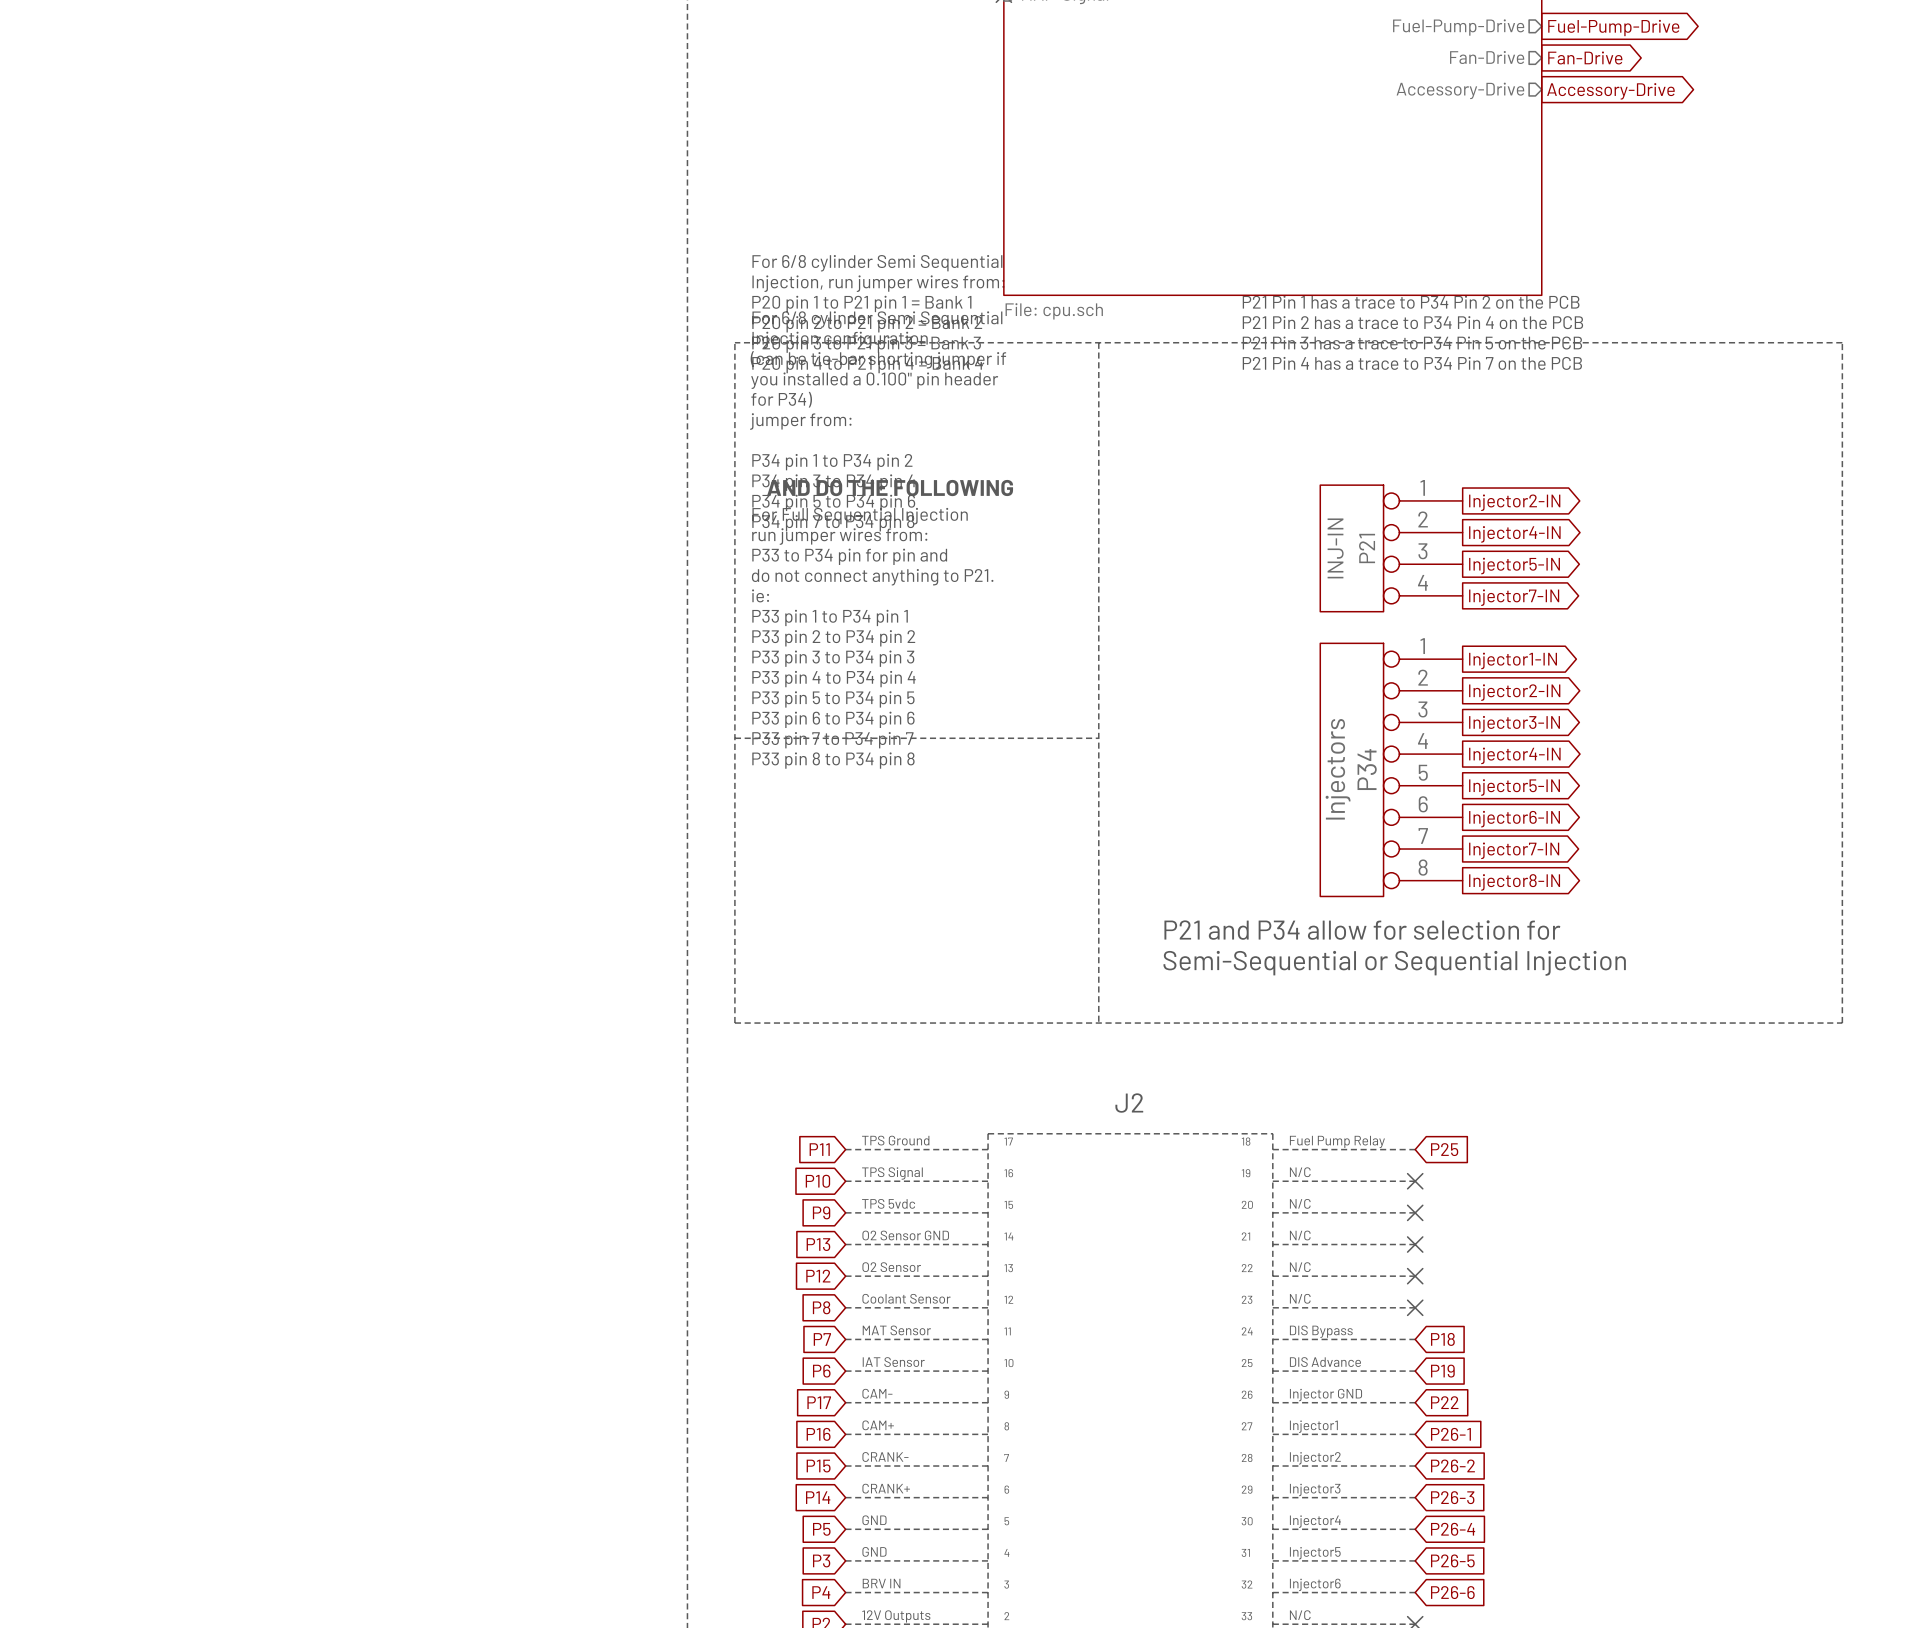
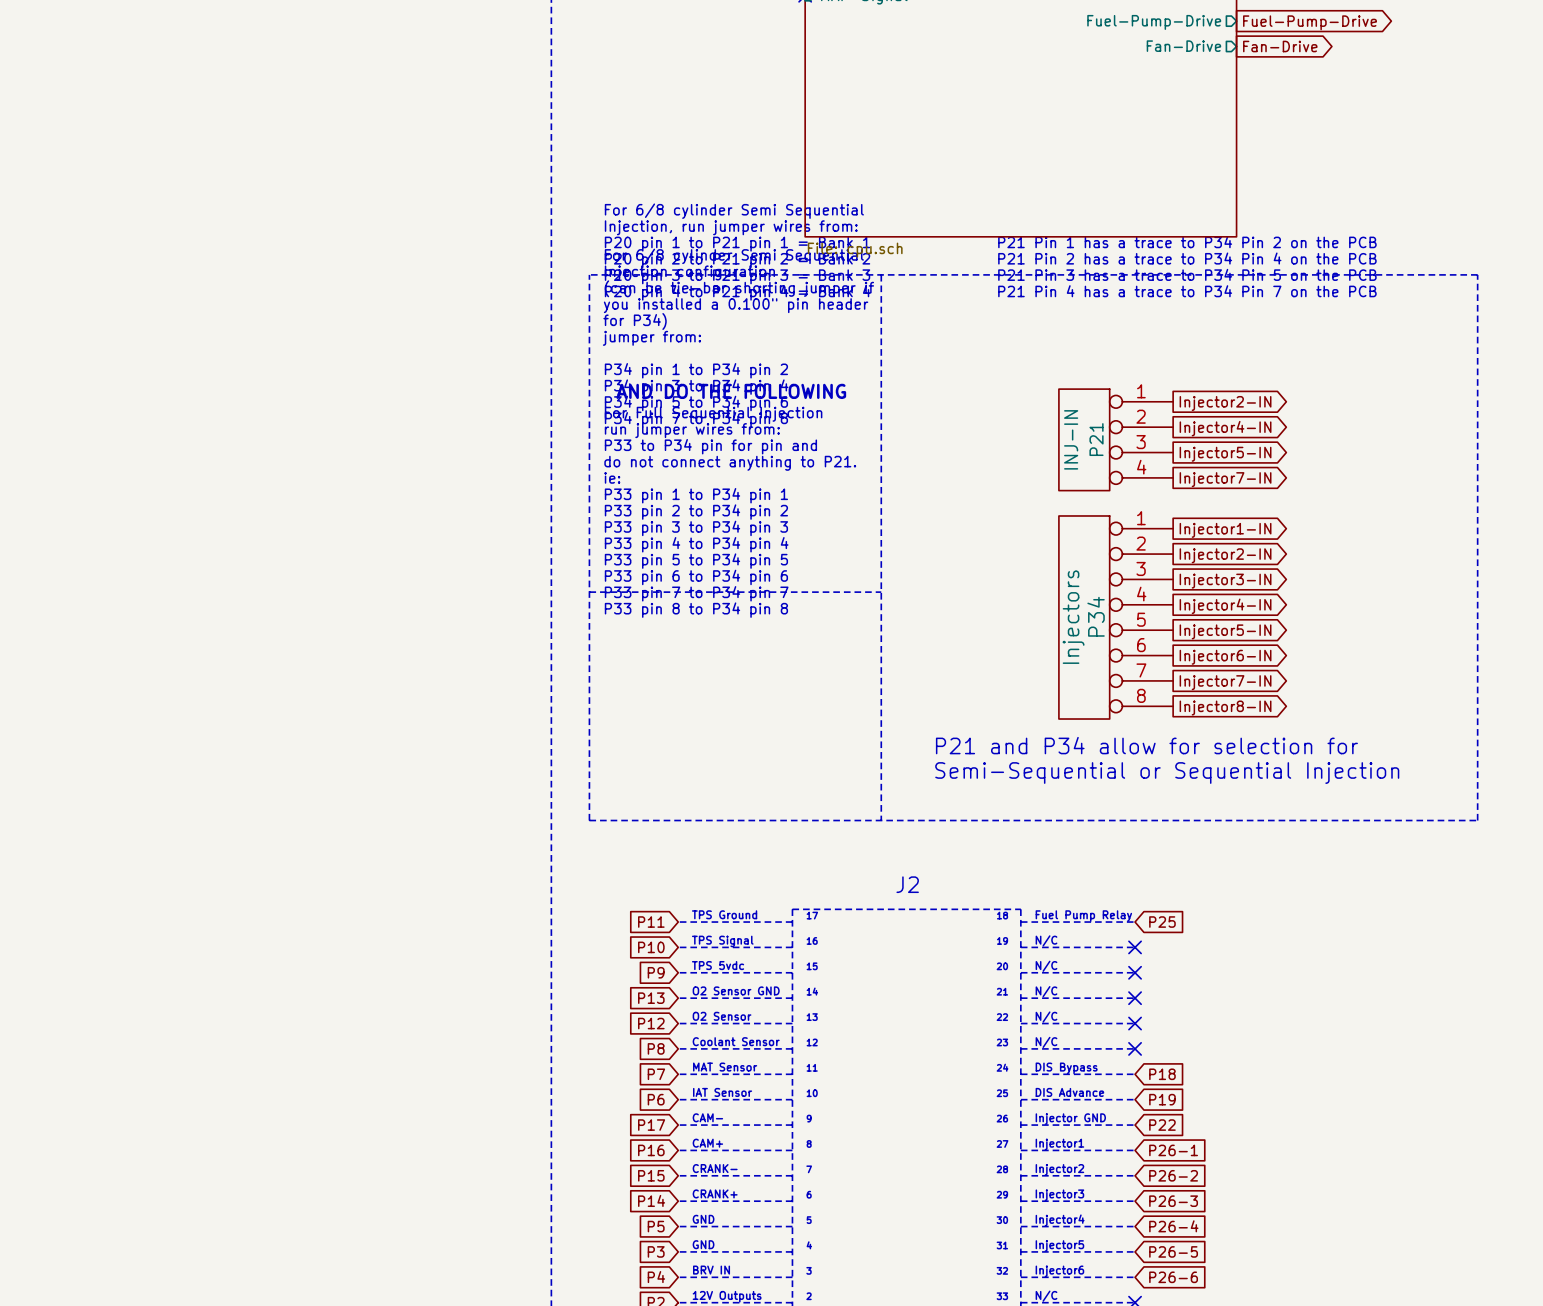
sheet pin: Accessory-Drive (1460, 90) -> none
global label: Accessory-Drive (1610, 91) -> none

